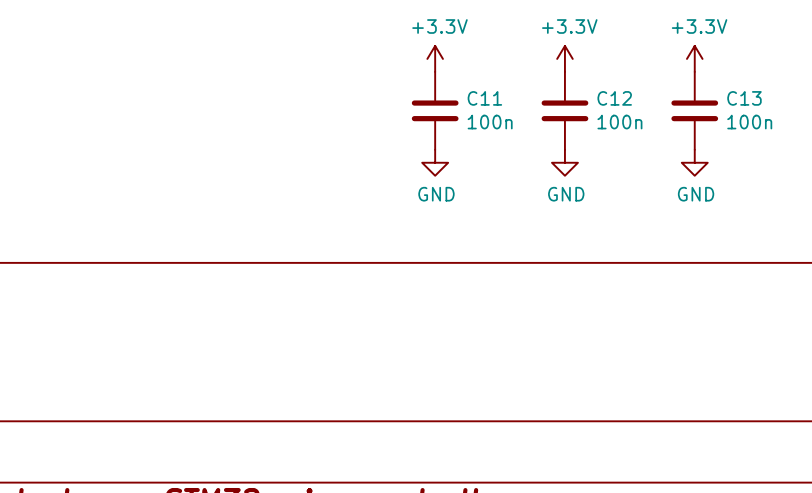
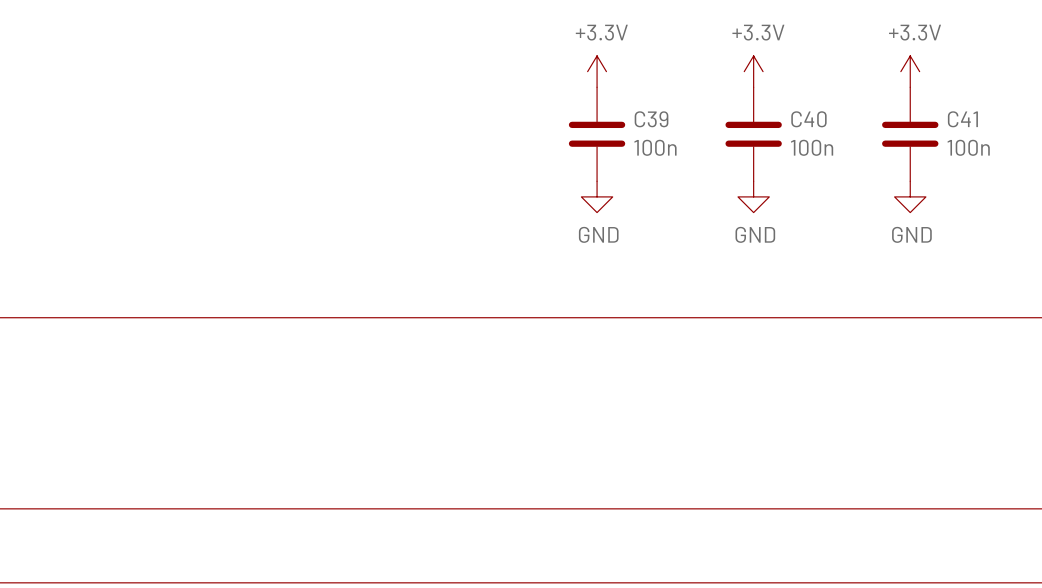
C11 name: C11 (484, 98) -> C39 (651, 119)
C12 name: C12 (614, 98) -> C40 (808, 119)
C13 name: C13 (744, 98) -> C41 (962, 119)

